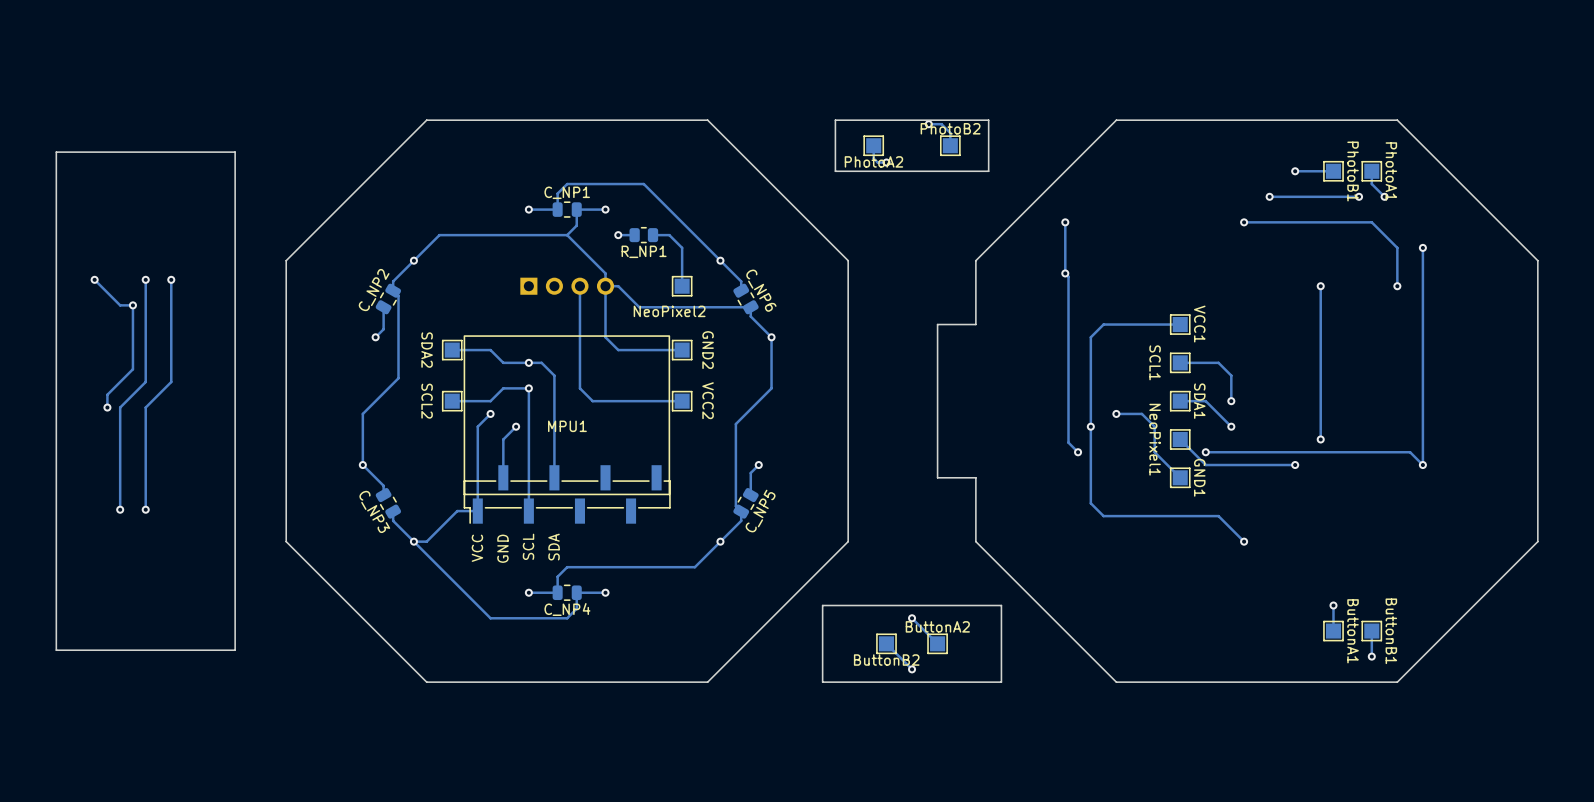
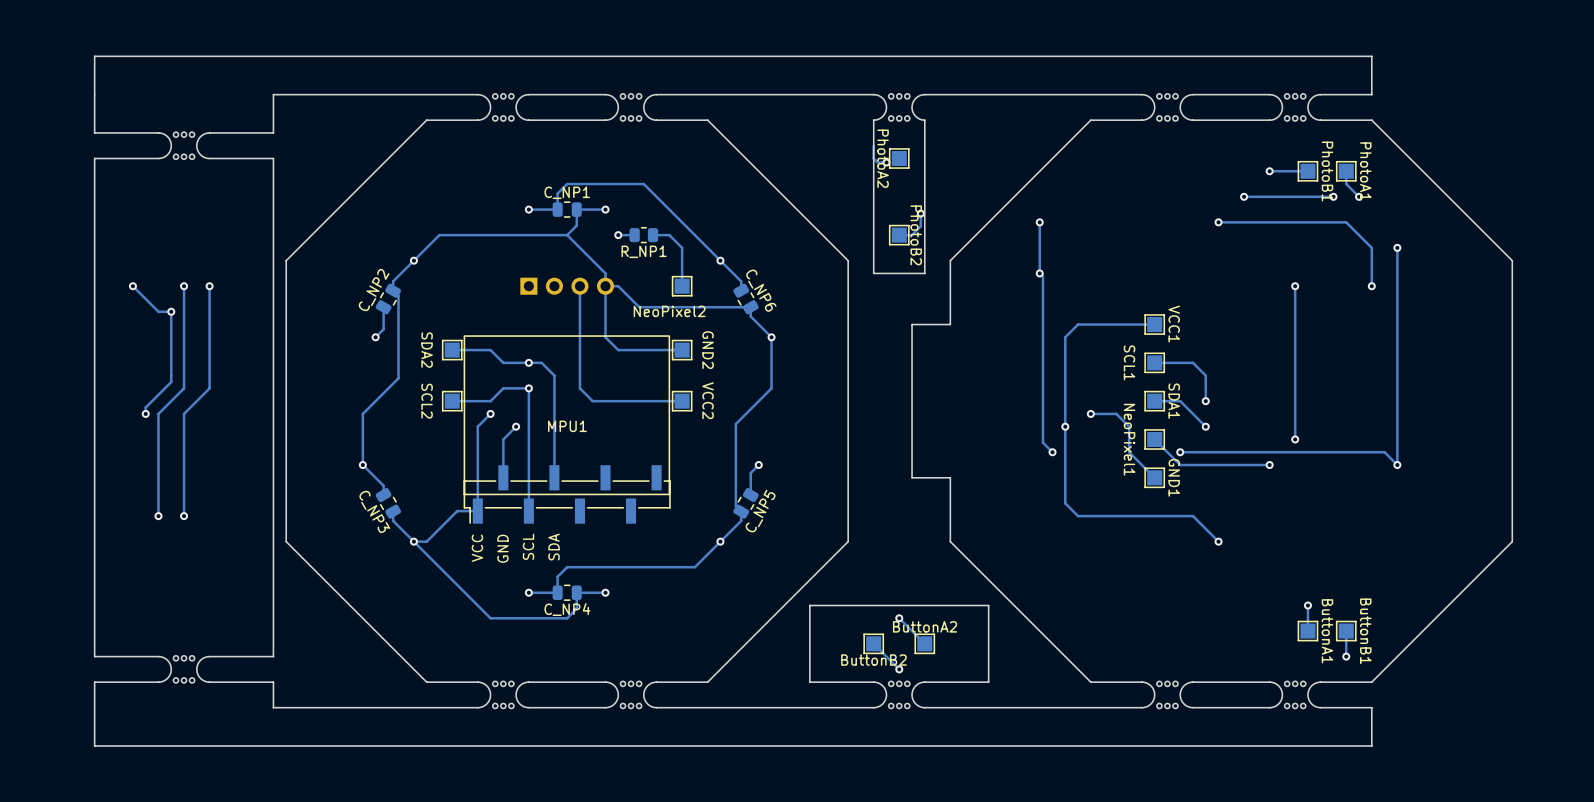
part: none -> (503, 107)
part: none -> (631, 107)
part: none -> (899, 107)
part: none -> (1167, 107)
part: none -> (1295, 107)
board edge: (528, 120) (477, 120) -> (477, 682) (486, 685) (490, 694) (487, 703) (479, 707) (273, 707) (273, 682) (207, 682) (198, 675) (197, 664) (206, 657) (273, 656) (273, 158) (208, 158) (200, 154) (196, 145) (200, 137) (208, 133) (273, 132) (273, 94) (479, 94) (487, 98) (490, 107) (486, 116) (477, 120)
board edge: (656, 120) (605, 120) -> (528, 120) (519, 116) (516, 107) (519, 98) (528, 94) (610, 95) (616, 101) (617, 110) (613, 116) (605, 120)
board edge: (988, 120) (835, 120) (835, 171) (988, 171) (988, 120) -> none
board edge: (1116, 120) (975, 260) (975, 324) (950, 324) -> (1116, 120) (1090, 120) (950, 260) (950, 324)
board edge: none -> (1141, 120) (1150, 116) (1154, 108) (1151, 98) (1143, 94) (924, 94) (917, 97) (912, 104) (913, 112) (918, 118) (924, 120) (924, 273) (873, 273) (873, 120) (883, 115) (886, 107) (885, 101) (879, 96) (654, 94) (646, 99) (643, 107) (647, 116) (656, 120)
board edge: (1193, 120) (1141, 120) -> (1193, 120) (1183, 116) (1180, 107) (1183, 98) (1193, 94) (1274, 95) (1280, 101) (1282, 110) (1276, 117) (1269, 120)
board edge: (1320, 120) (1269, 120) -> (1320, 120) (1312, 117) (1308, 110) (1308, 102) (1314, 96) (1320, 94) (1371, 94) (1371, 56) (94, 56) (94, 132) (160, 133) (167, 136) (171, 145) (167, 154) (160, 158) (94, 158) (94, 656) (160, 656) (167, 660) (171, 669) (167, 678) (160, 682) (94, 682) (94, 746) (1371, 746) (1371, 707) (1320, 707) (1314, 705) (1308, 699) (1308, 691) (1312, 684) (1320, 682)
board edge: (1371, 120) (1397, 120) (1537, 260) (1537, 541) (1397, 682) (1371, 682) -> (1371, 120) (1512, 260) (1512, 541) (1371, 682)
track: (928, 124) (941, 124) (950, 132) (950, 145) -> none
via: (928, 124) -> none
PhotoB2 name rotation: 0° (950, 128) -> 90° clockwise (916, 235)
part: none -> (184, 145)
PhotoA2 position: (873, 145) -> (899, 158)
PhotoB2 position: (950, 145) -> (899, 235)
board edge: (235, 152) (56, 152) (56, 650) (235, 650) (235, 152) -> none
PhotoA2 name rotation: 0° (873, 161) -> 90° clockwise (883, 158)
via: none -> (1269, 171)
via: (1295, 171) -> none
track: (1333, 171) (1307, 171) -> (1295, 171) (1269, 171)
PhotoB1 position: (1333, 171) -> (1307, 171)
track: (1371, 171) (1371, 184) (1384, 196) -> none
PhotoA1 position: (1371, 171) -> (1346, 171)
via: none -> (1244, 196)
track: none -> (1269, 196) (1244, 196)
via: (1269, 196) -> none
via: none -> (1333, 196)
track: (1359, 196) (1333, 196) -> (1359, 196) (1346, 184) (1346, 171)
via: (1384, 196) -> none
track: none -> (920, 213) (920, 226) (912, 235) (899, 235)
via: none -> (920, 213)
track: (1065, 222) (1065, 273) (1068, 276) (1068, 442) (1078, 452) -> (1039, 222) (1039, 273) (1042, 276) (1042, 442) (1052, 452)
via position: (1065, 222) -> (1039, 222)
via: none -> (1218, 222)
track: none -> (1244, 222) (1218, 222)
via: (1244, 222) -> none
track: (1346, 222) (1371, 222) (1397, 247) -> (1346, 222) (1371, 247) (1371, 286)
via: none -> (1397, 247)
track: (1422, 247) (1422, 465) (1410, 452) (1384, 452) -> (1397, 286) (1397, 465) (1384, 452)
via: (1422, 247) -> none
via position: (1065, 273) -> (1039, 273)
track: (94, 279) (120, 305) (132, 305) (132, 369) (107, 394) (107, 407) -> none
via: (94, 279) -> none
track: (145, 279) (145, 382) (120, 407) (120, 509) -> (184, 286) (184, 388) (158, 413) (158, 516)
via: (145, 279) -> none
track: (171, 279) (171, 311) -> (132, 286) (158, 311) (171, 311)
via position: (171, 279) -> (184, 286)
via: none -> (132, 286)
track: none -> (209, 286) (209, 388) (184, 413) (184, 516)
via: none -> (209, 286)
via: none -> (1295, 286)
track: (1320, 286) (1320, 439) -> (1295, 286) (1295, 439)
via: (1320, 286) -> none
via: none -> (1371, 286)
via: (1397, 286) -> none
via: (132, 305) -> none
via: none -> (171, 311)
board edge: (937, 324) (937, 477) -> (937, 324) (912, 324) (912, 477) (937, 477)
track: (1103, 324) (1090, 337) (1090, 503) (1103, 516) -> (1103, 324) (1078, 324) (1065, 337) (1065, 503) (1078, 516) (1103, 516)
track: (1180, 324) (1154, 324) -> (1180, 362) (1154, 362)
VCC1 position: (1180, 324) -> (1154, 324)
SCL1 position: (1180, 362) -> (1154, 362)
track: (1193, 362) (1218, 362) (1231, 375) (1231, 401) -> (1193, 362) (1205, 375) (1205, 401)
track: (1180, 401) (1205, 401) (1231, 426) -> (1154, 401) (1180, 401) (1205, 426)
SDA1 position: (1180, 401) -> (1154, 401)
via: none -> (1205, 401)
via: (1231, 401) -> none
via position: (107, 407) -> (145, 413)
track: (145, 413) (145, 509) -> none
via: none -> (1090, 413)
track: (1116, 413) (1141, 413) (1154, 426) (1154, 452) (1180, 477) -> (1090, 413) (1116, 413) (1129, 426) (1129, 452) (1154, 477)
via: (1116, 413) -> none
via: none -> (1065, 426)
via: (1090, 426) -> none
via: none -> (1205, 426)
via: (1231, 426) -> none
track: (1180, 439) (1205, 465) -> (1154, 439) (1180, 465) (1205, 465)
NeoPixel1 position: (1180, 439) -> (1154, 439)
via: none -> (1295, 439)
via: (1320, 439) -> none
via: none -> (1052, 452)
via: (1078, 452) -> none
via: none -> (1180, 452)
via: (1205, 452) -> none
via: none -> (1269, 465)
track: (1295, 465) (1269, 465) -> (1205, 452) (1180, 452)
via: (1295, 465) -> none
via position: (1422, 465) -> (1397, 465)
board edge: (950, 477) (975, 477) (975, 541) (1116, 682) -> (950, 477) (950, 541) (1090, 682) (1116, 682)
GND1 position: (1180, 477) -> (1154, 477)
via: (120, 509) -> none
via position: (145, 509) -> (158, 516)
via: none -> (184, 516)
track: (1193, 516) (1218, 516) (1244, 541) -> (1193, 516) (1218, 541)
via position: (1244, 541) -> (1218, 541)
board edge: (822, 605) (822, 682) -> (822, 605) (809, 605) (809, 682) (822, 682)
board edge: (988, 605) (1001, 605) (1001, 682) (988, 682) -> (988, 605) (988, 682)
track: (1333, 605) (1333, 631) -> (1307, 605) (1307, 631)
via position: (1333, 605) -> (1307, 605)
track: (912, 618) (937, 643) -> (899, 618) (924, 643)
via position: (912, 618) -> (899, 618)
ButtonA1 position: (1333, 631) -> (1307, 631)
track: (1371, 631) (1371, 656) -> (1346, 631) (1346, 656)
ButtonB1 position: (1371, 631) -> (1346, 631)
track: (886, 643) (912, 669) -> (873, 643) (899, 669)
ButtonB2 position: (886, 643) -> (873, 643)
ButtonA2 position: (937, 643) -> (924, 643)
via position: (1371, 656) -> (1346, 656)
part: none -> (184, 669)
via position: (912, 669) -> (899, 669)
board edge: (528, 682) (477, 682) -> none
board edge: (656, 682) (605, 682) -> (528, 682) (520, 685) (516, 694) (520, 704) (528, 707) (610, 706) (616, 700) (617, 691) (612, 684) (605, 682)
board edge: (924, 682) (873, 682) -> (656, 682) (647, 685) (643, 694) (647, 703) (656, 707) (875, 707) (884, 702) (886, 693) (882, 685) (873, 682)
board edge: none -> (1141, 682) (1151, 686) (1154, 694) (1151, 703) (1141, 707) (923, 707) (915, 703) (912, 693) (916, 685) (924, 682)
board edge: (1193, 682) (1141, 682) -> (1193, 682) (1183, 686) (1180, 694) (1183, 703) (1193, 707) (1274, 706) (1280, 700) (1282, 691) (1276, 684) (1269, 682)
board edge: (1320, 682) (1269, 682) -> none
part: none -> (503, 694)
part: none -> (631, 694)
part: none -> (899, 694)
part: none -> (1167, 694)
part: none -> (1295, 694)

